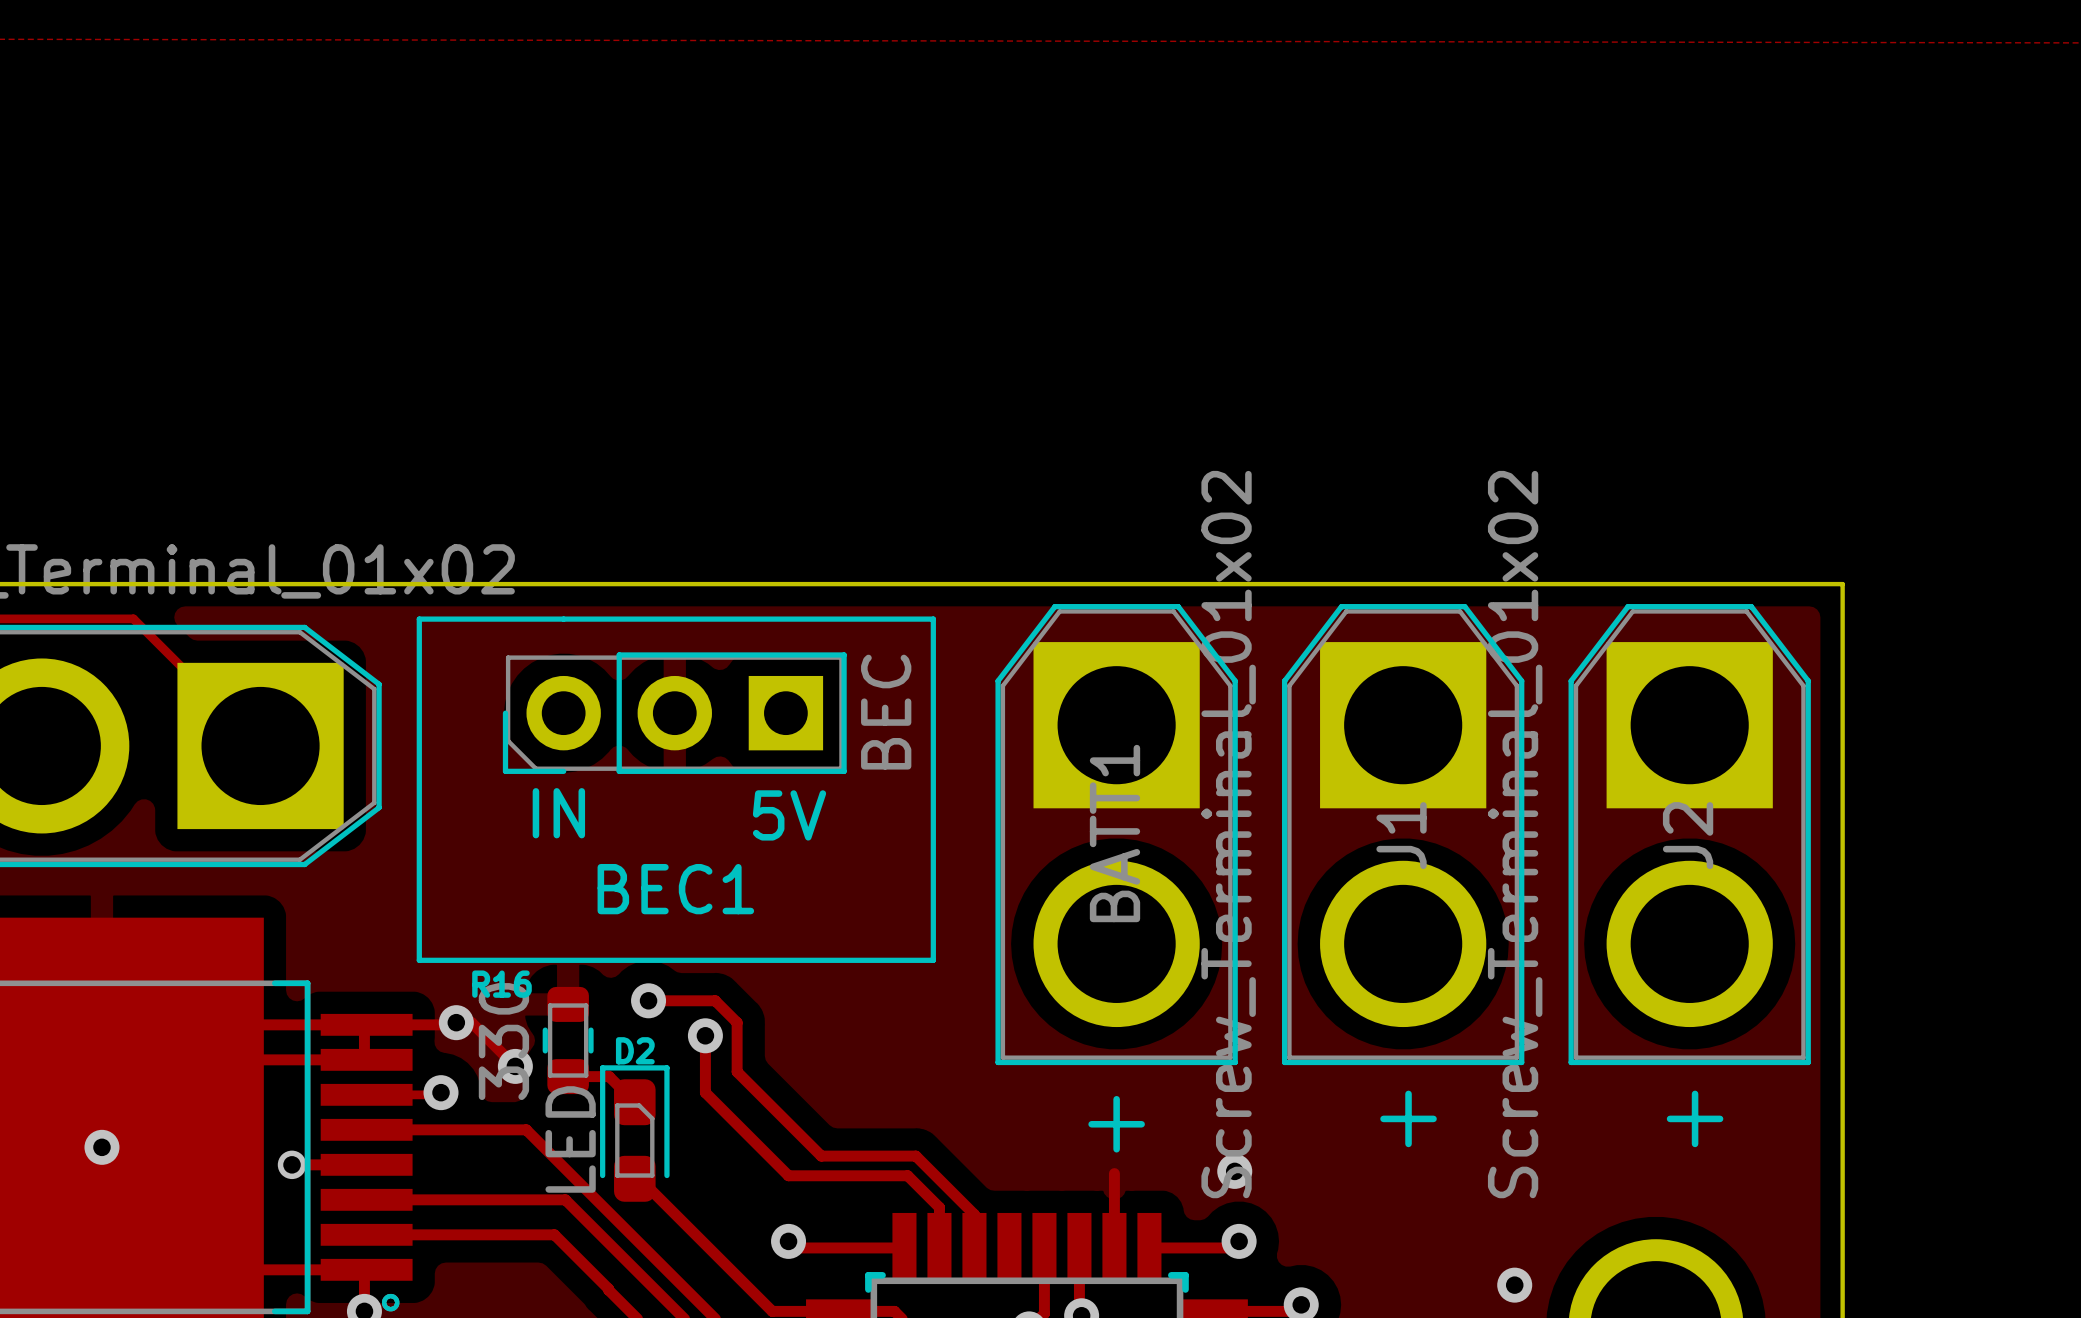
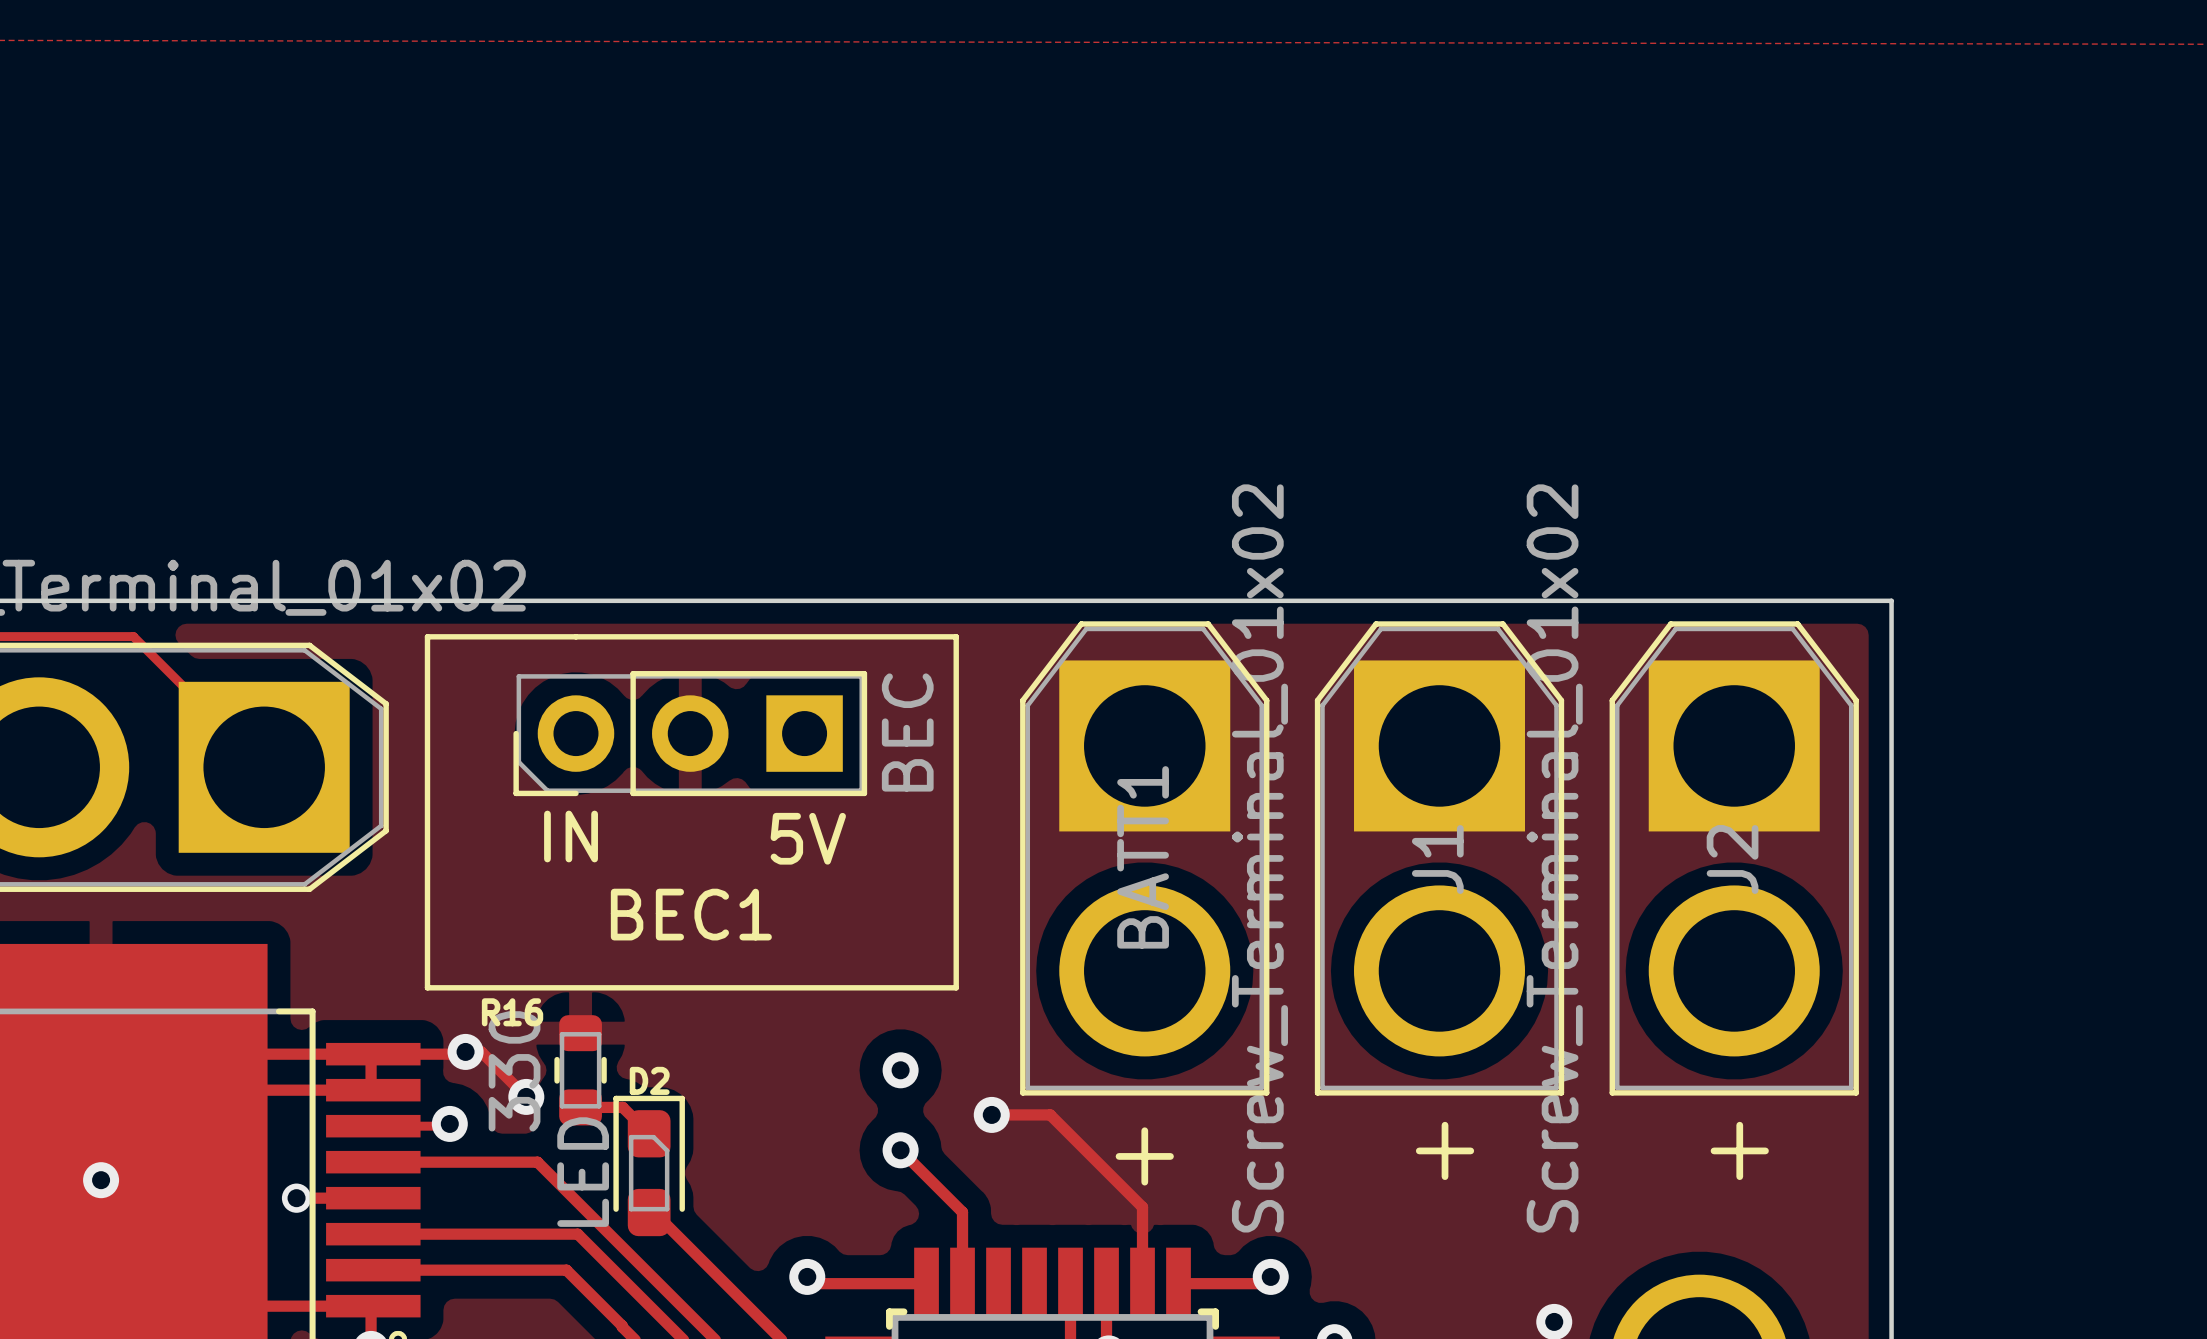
track: (648, 1000) (715, 1000) (737, 1022) (737, 1071) (821, 1156) (915, 1156) (974, 1214) (974, 1247) -> none
via: (648, 1000) -> none
track: (705, 1035) (705, 1092) (788, 1175) (907, 1175) (939, 1207) -> (900, 1150) (962, 1212) (962, 1242)
via: (705, 1035) -> none
via: none -> (900, 1070)
track: none -> (991, 1114) (1050, 1114) (1142, 1207)
via: none -> (991, 1114)
via: none -> (900, 1150)
via: (1234, 1171) -> none

